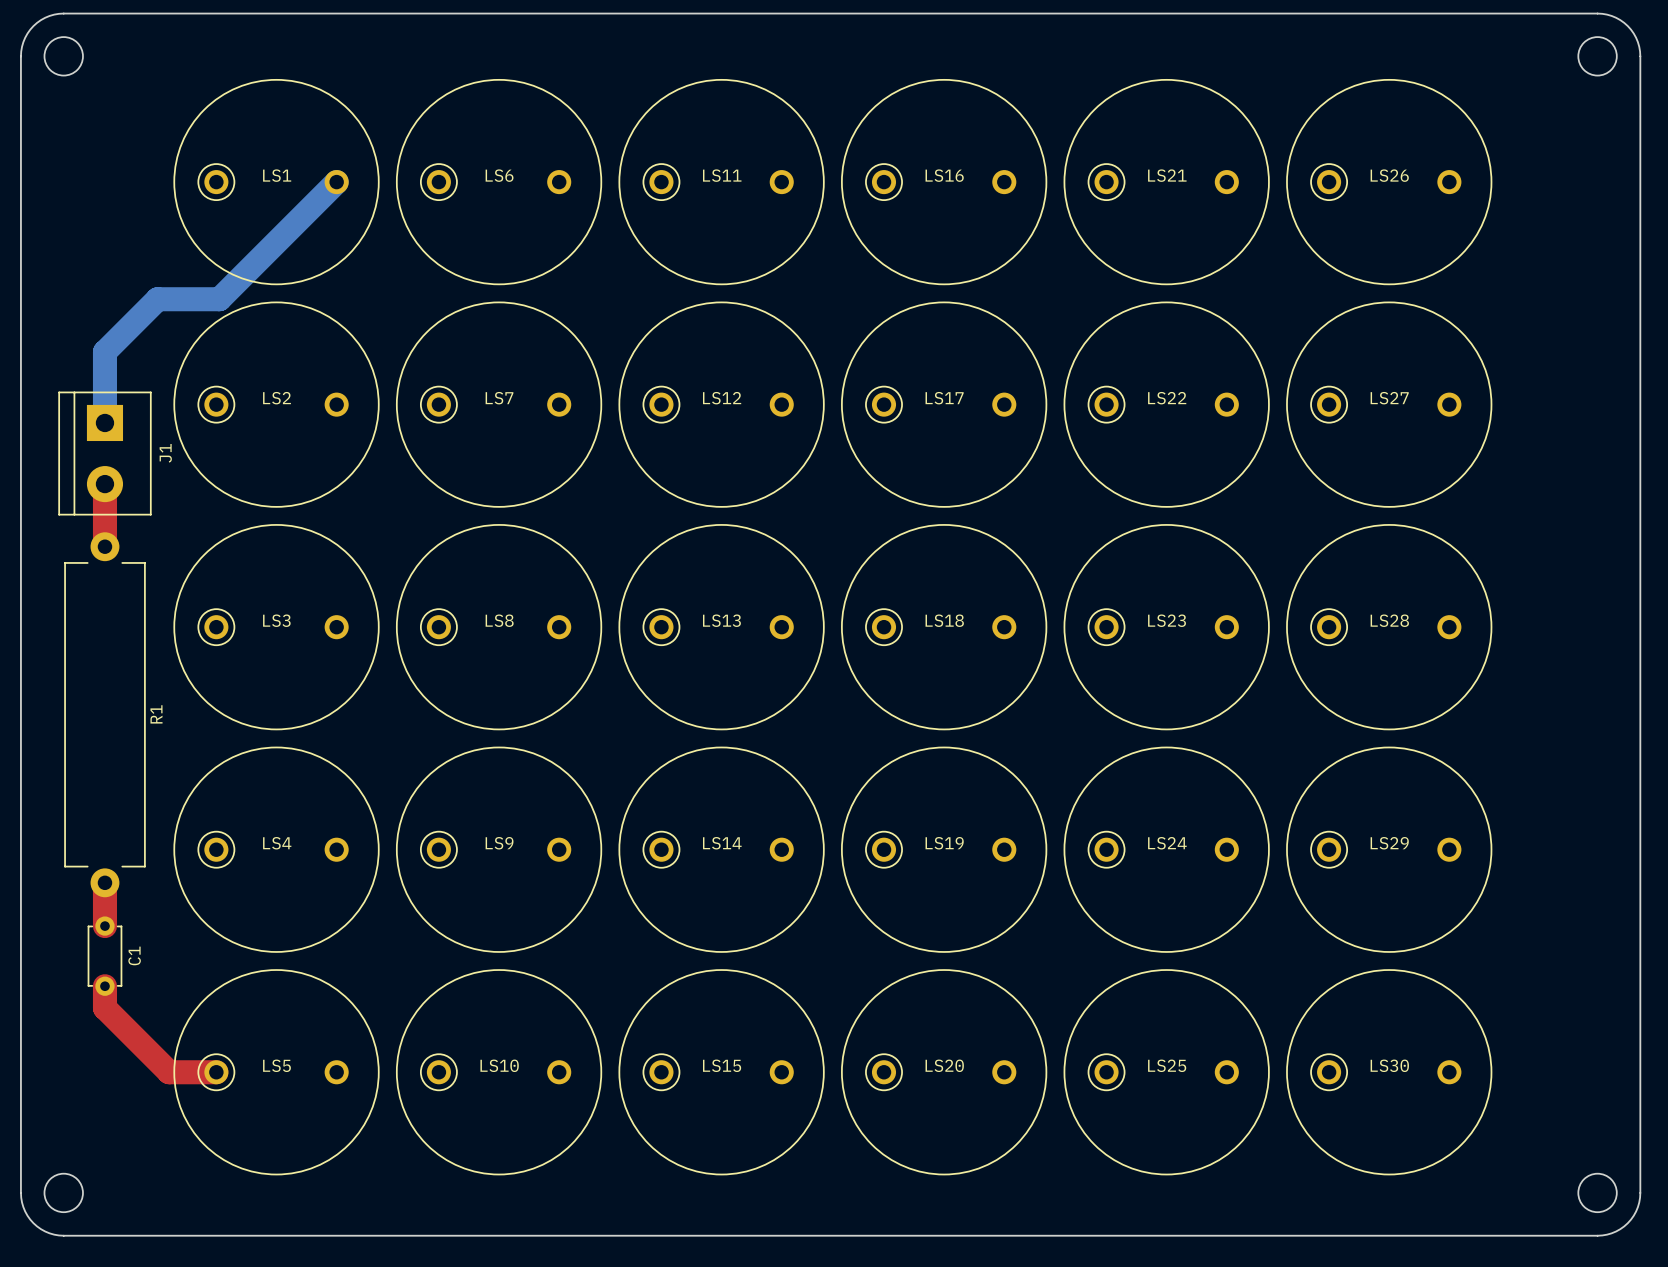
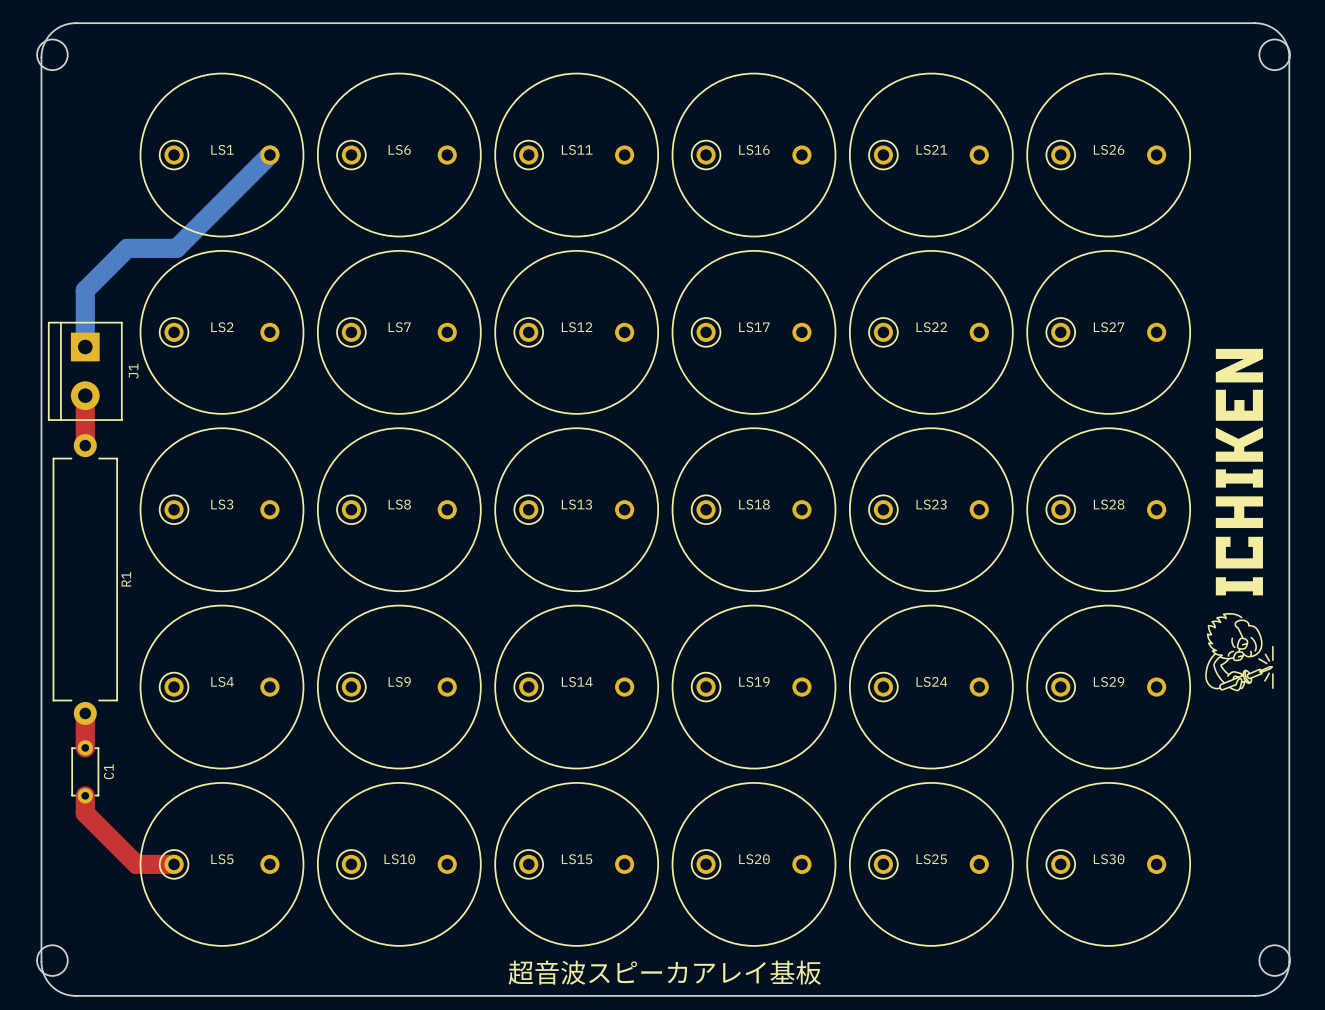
board edge: (63, 13) (1597, 13) (1611, 15) (1624, 22) (1636, 37) (1640, 56) (1640, 1192) (1637, 1207) (1631, 1219) (1616, 1231) (1597, 1235) (63, 1235) (49, 1233) (37, 1226) (25, 1211) (20, 1192) (20, 56) (25, 37) (33, 26) (49, 15) (63, 13) -> (75, 23) (60, 26) (51, 33) (44, 42) (41, 57) (41, 961) (44, 976) (54, 988) (64, 993) (75, 995) (1255, 995) (1270, 992) (1281, 983) (1287, 973) (1289, 961) (1289, 57) (1285, 42) (1276, 30) (1266, 25) (1255, 23) (75, 23)
drawing: none -> [1215, 348, 1264, 596]
drawing: none -> [1205, 613, 1274, 692]
text: none -> 超音波スピーカアレイ基板 (664, 972)

